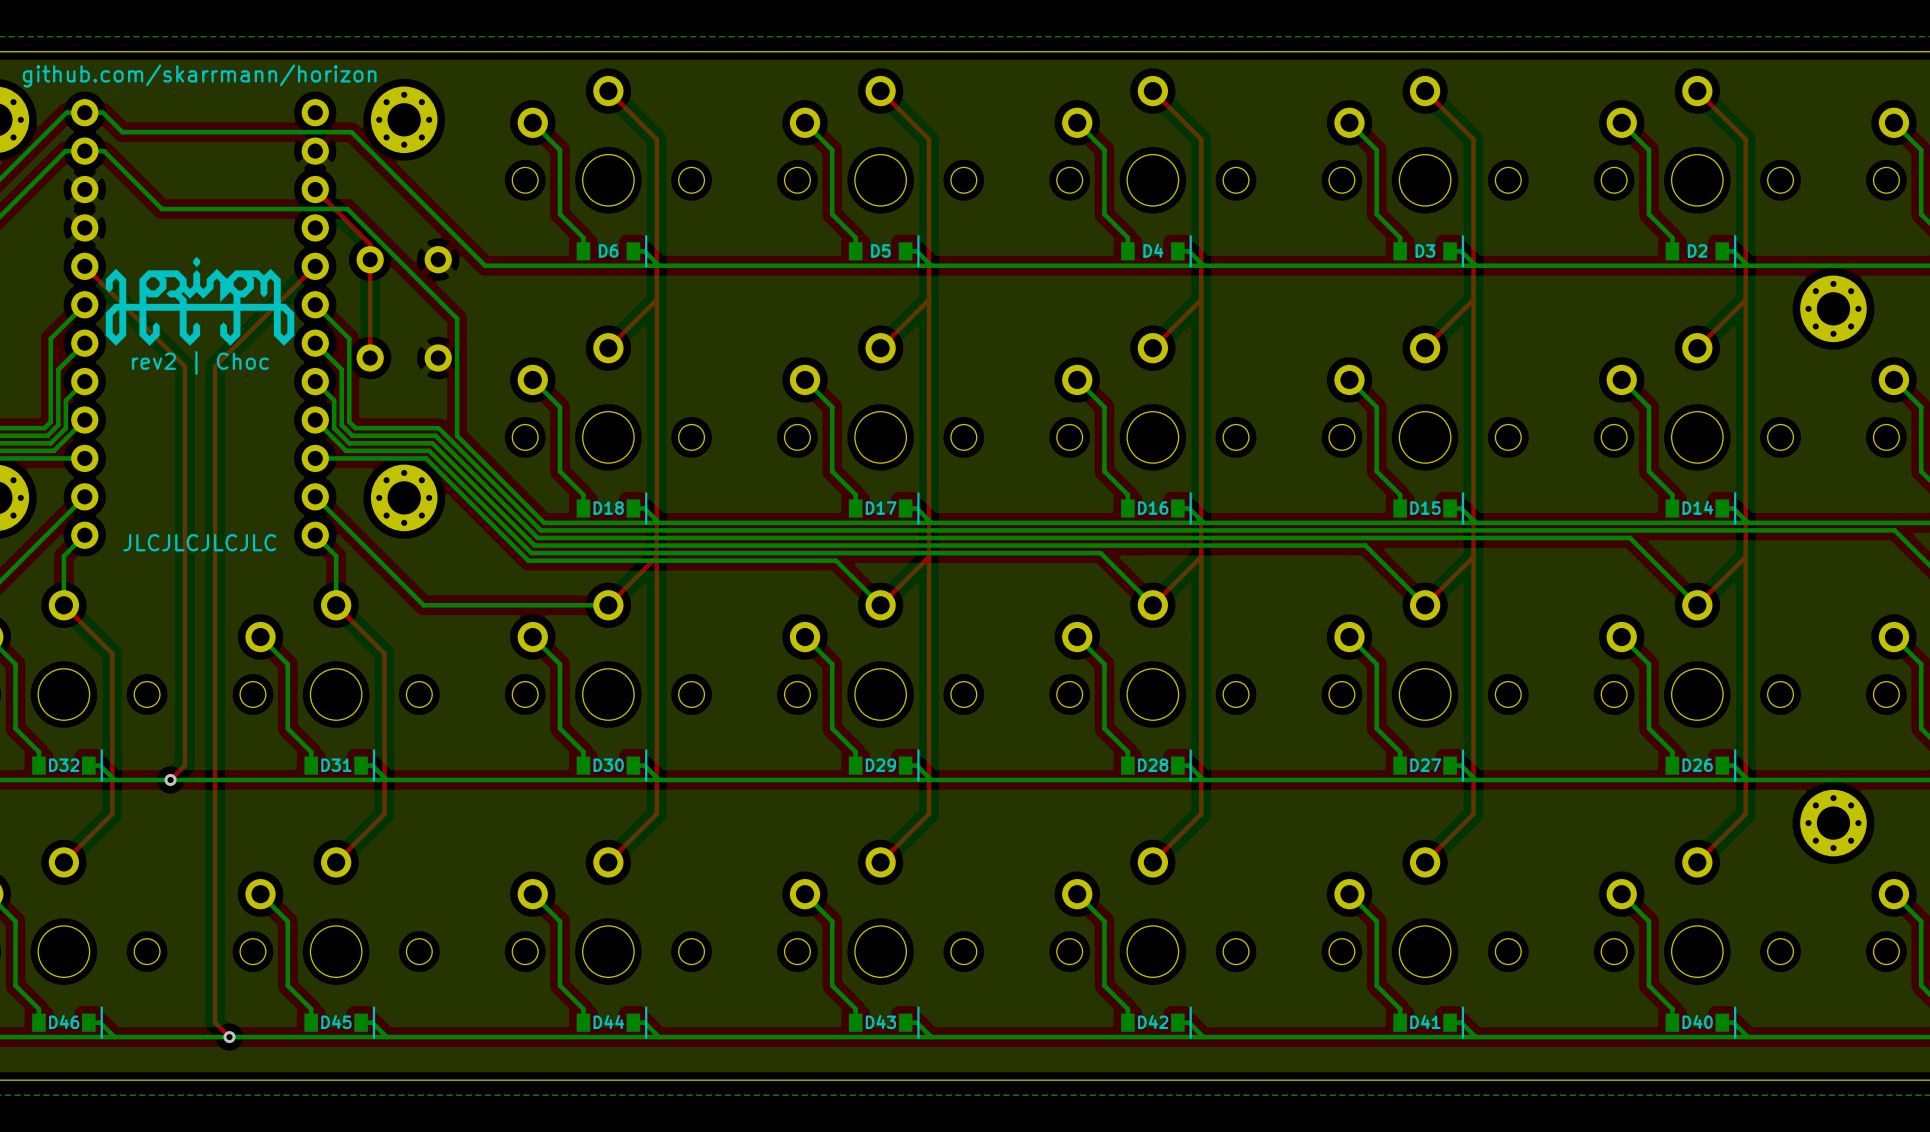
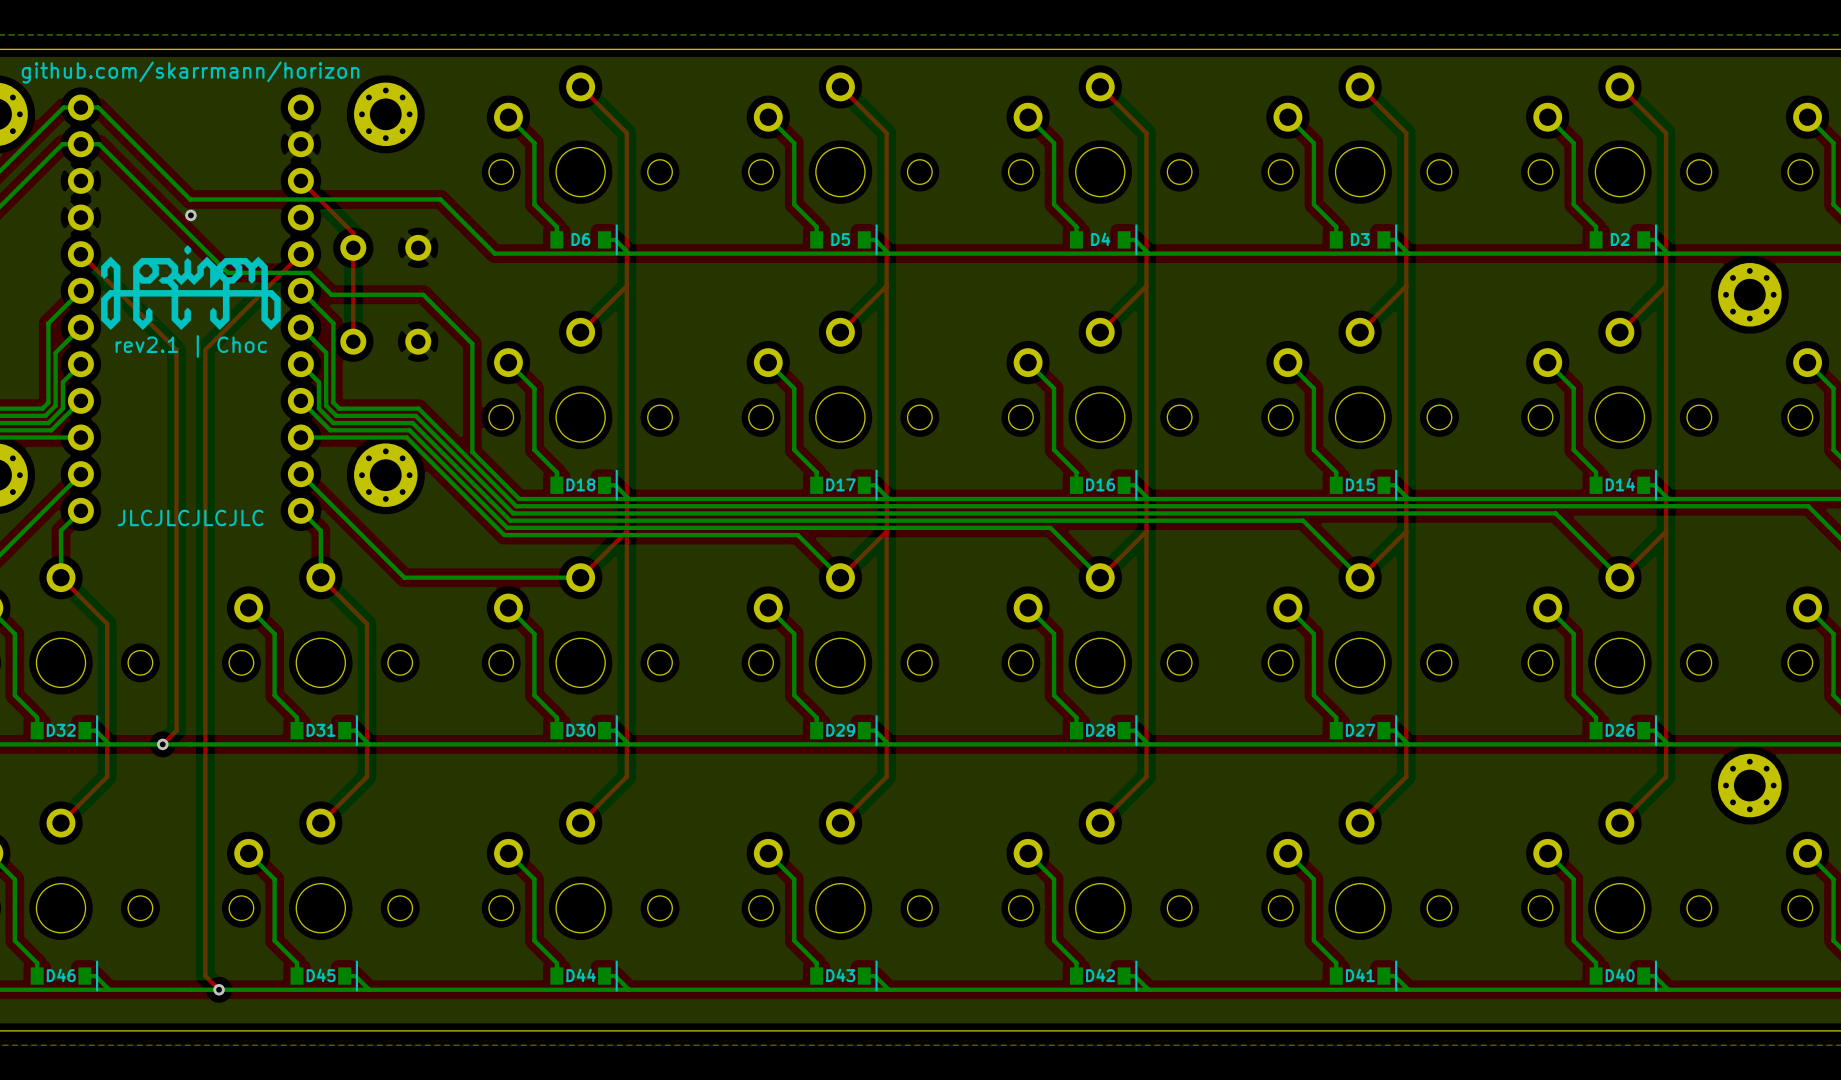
bottom track: (122, 132) (351, 132) (485, 265) (518, 265) -> (331, 199) (440, 199) (494, 253)
bottom track: (199, 209) (161, 209) -> (190, 199) (116, 126)
bottom track: (347, 209) (457, 318) (457, 435) (494, 473) -> (154, 199) (227, 272) (309, 272) (331, 294) (423, 294) (472, 343) (472, 452)
via: none -> (190, 215)
text: rev2 | Choc (200, 363) -> rev2.1 | Choc (191, 346)

